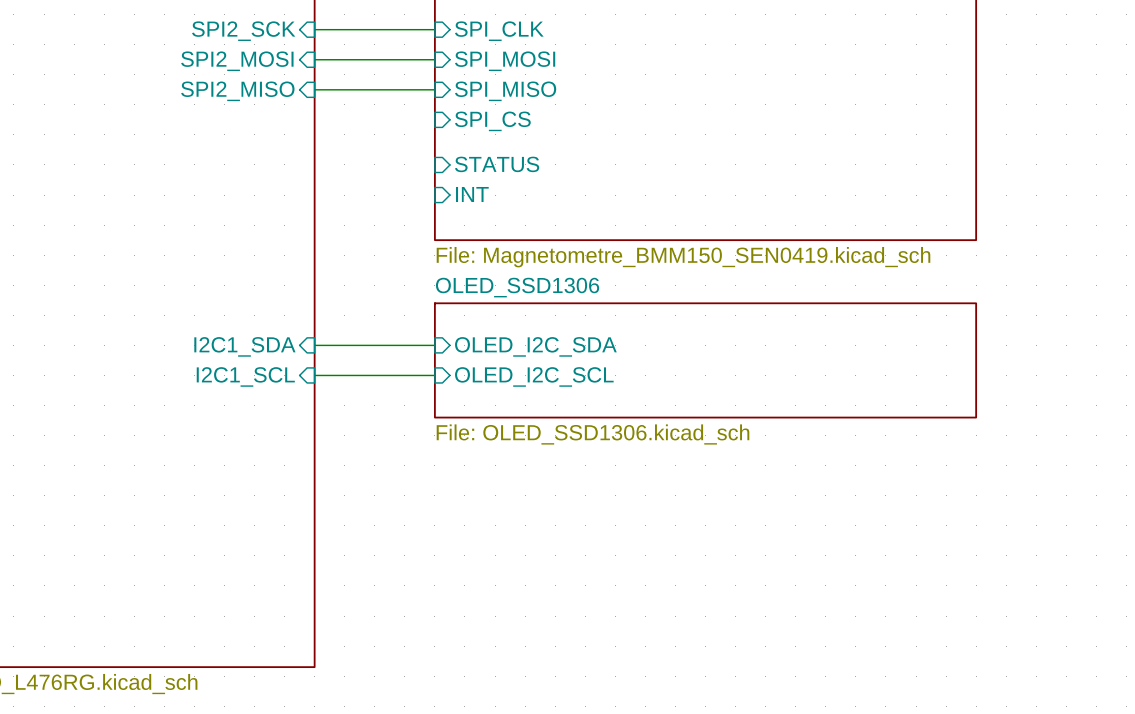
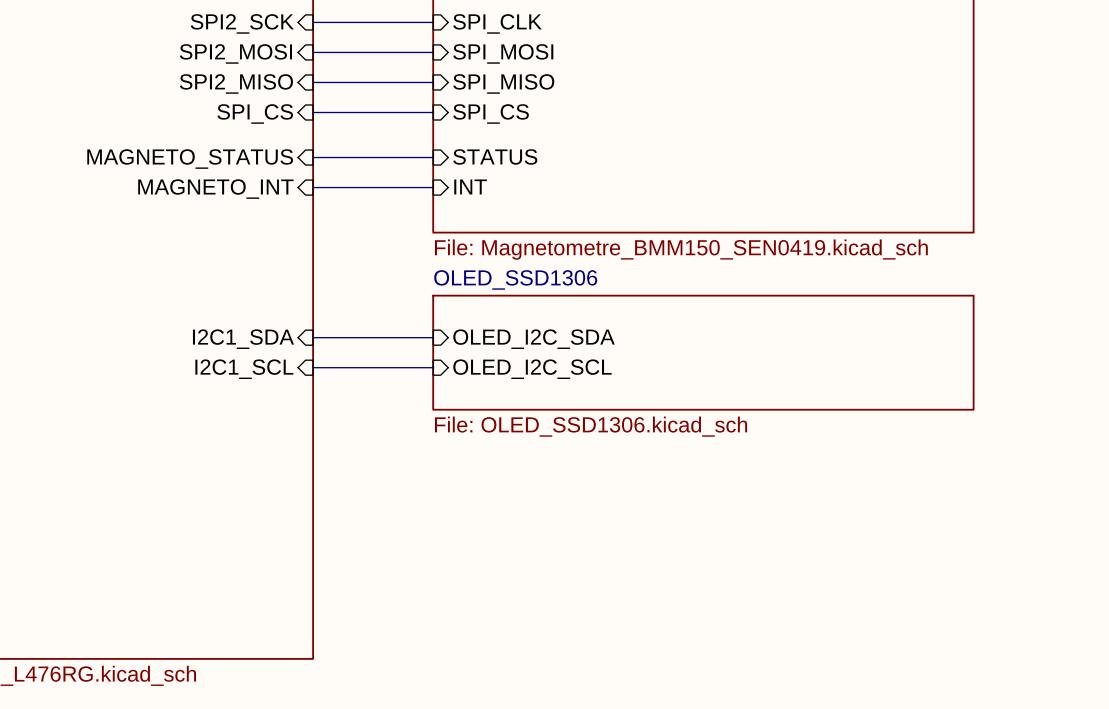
wire: none -> (313, 112) (433, 112)
sheet pin: none -> SPI_CS (255, 113)
wire: none -> (313, 157) (433, 157)
sheet pin: none -> MAGNETO_STATUS (190, 159)
wire: none -> (313, 187) (433, 187)
sheet pin: none -> MAGNETO_INT (215, 189)

